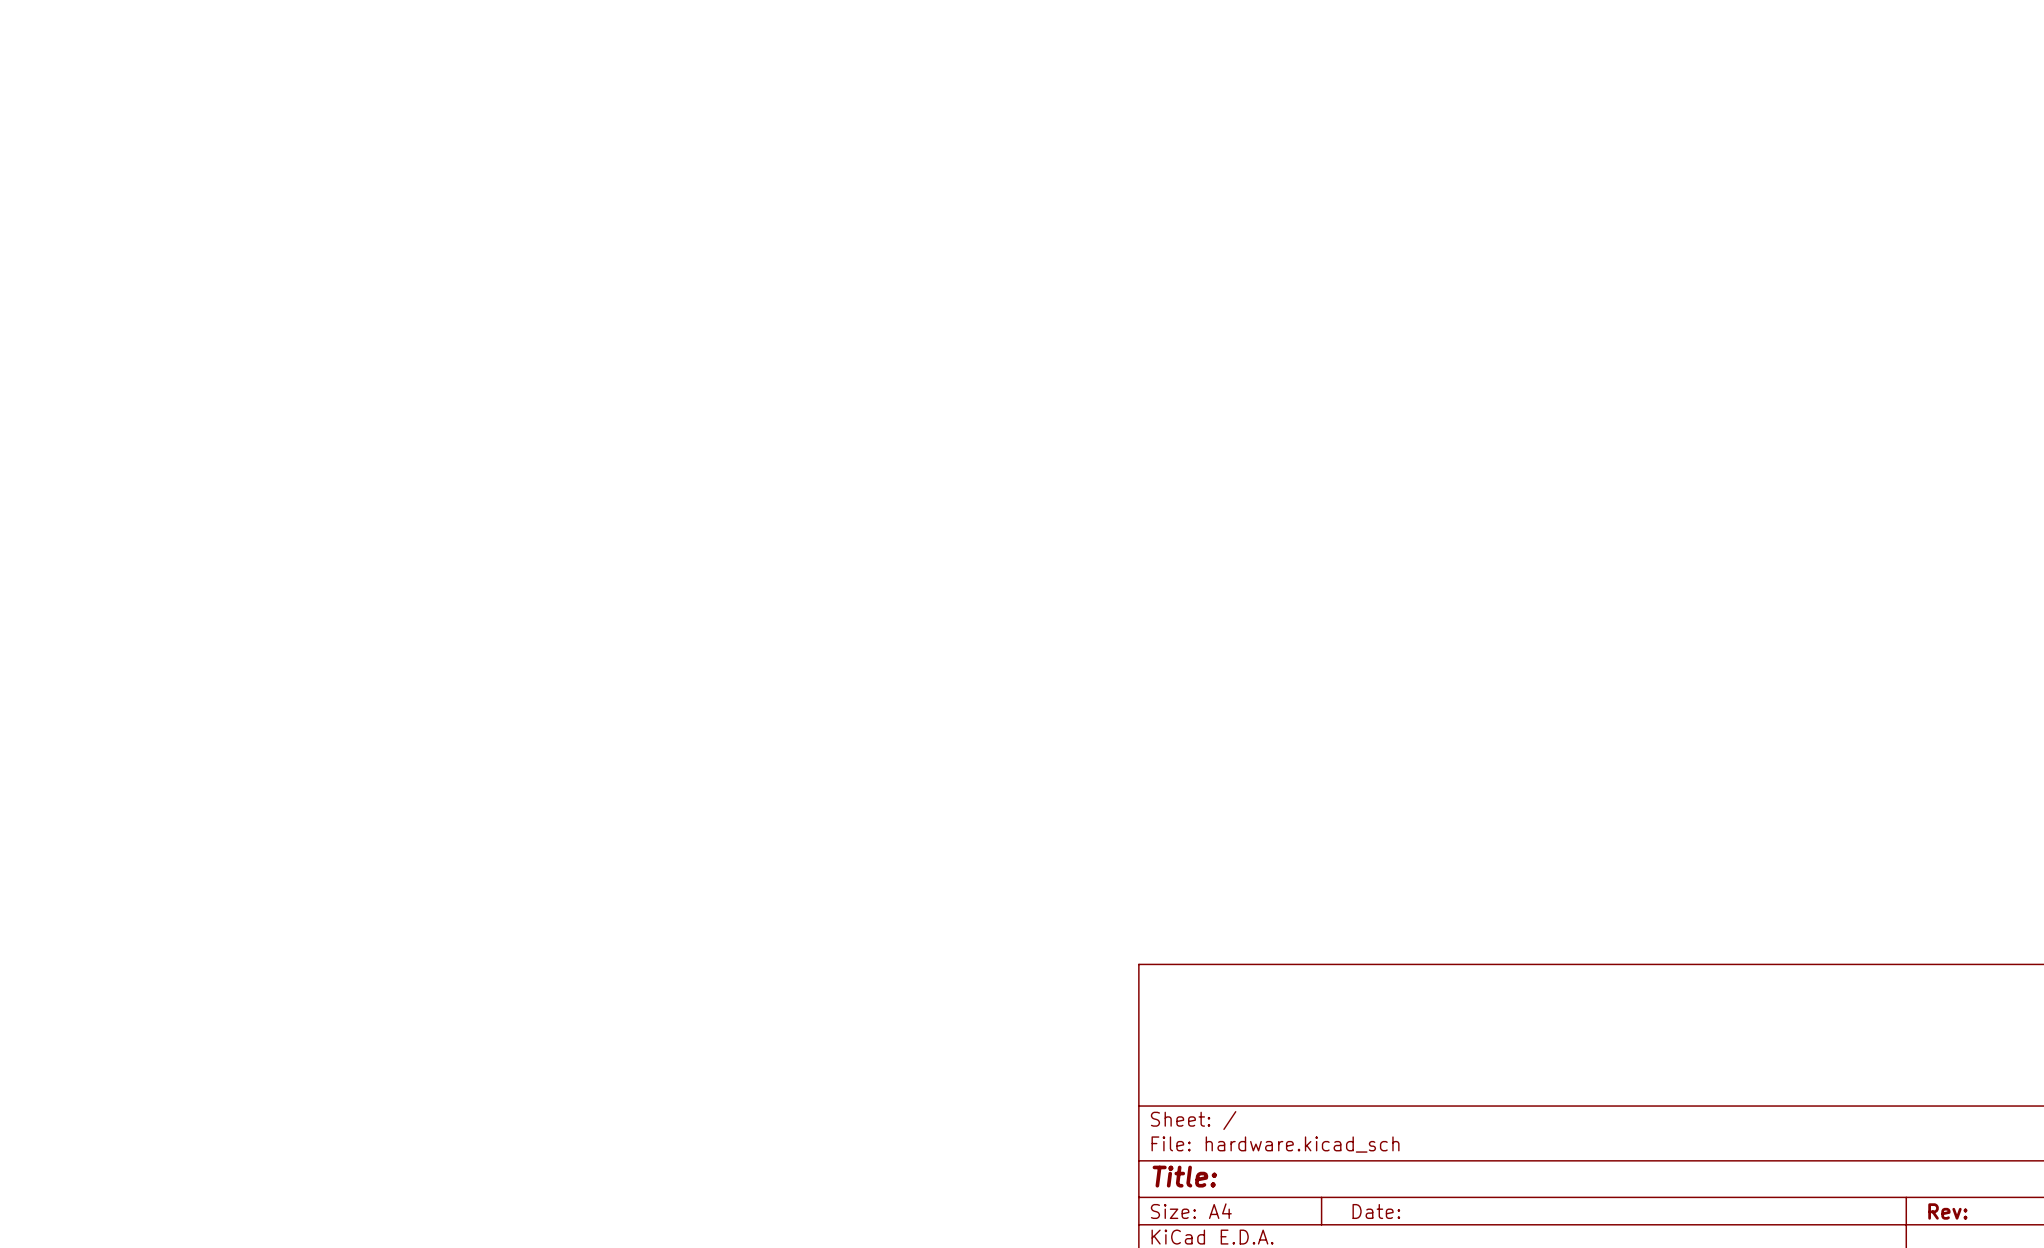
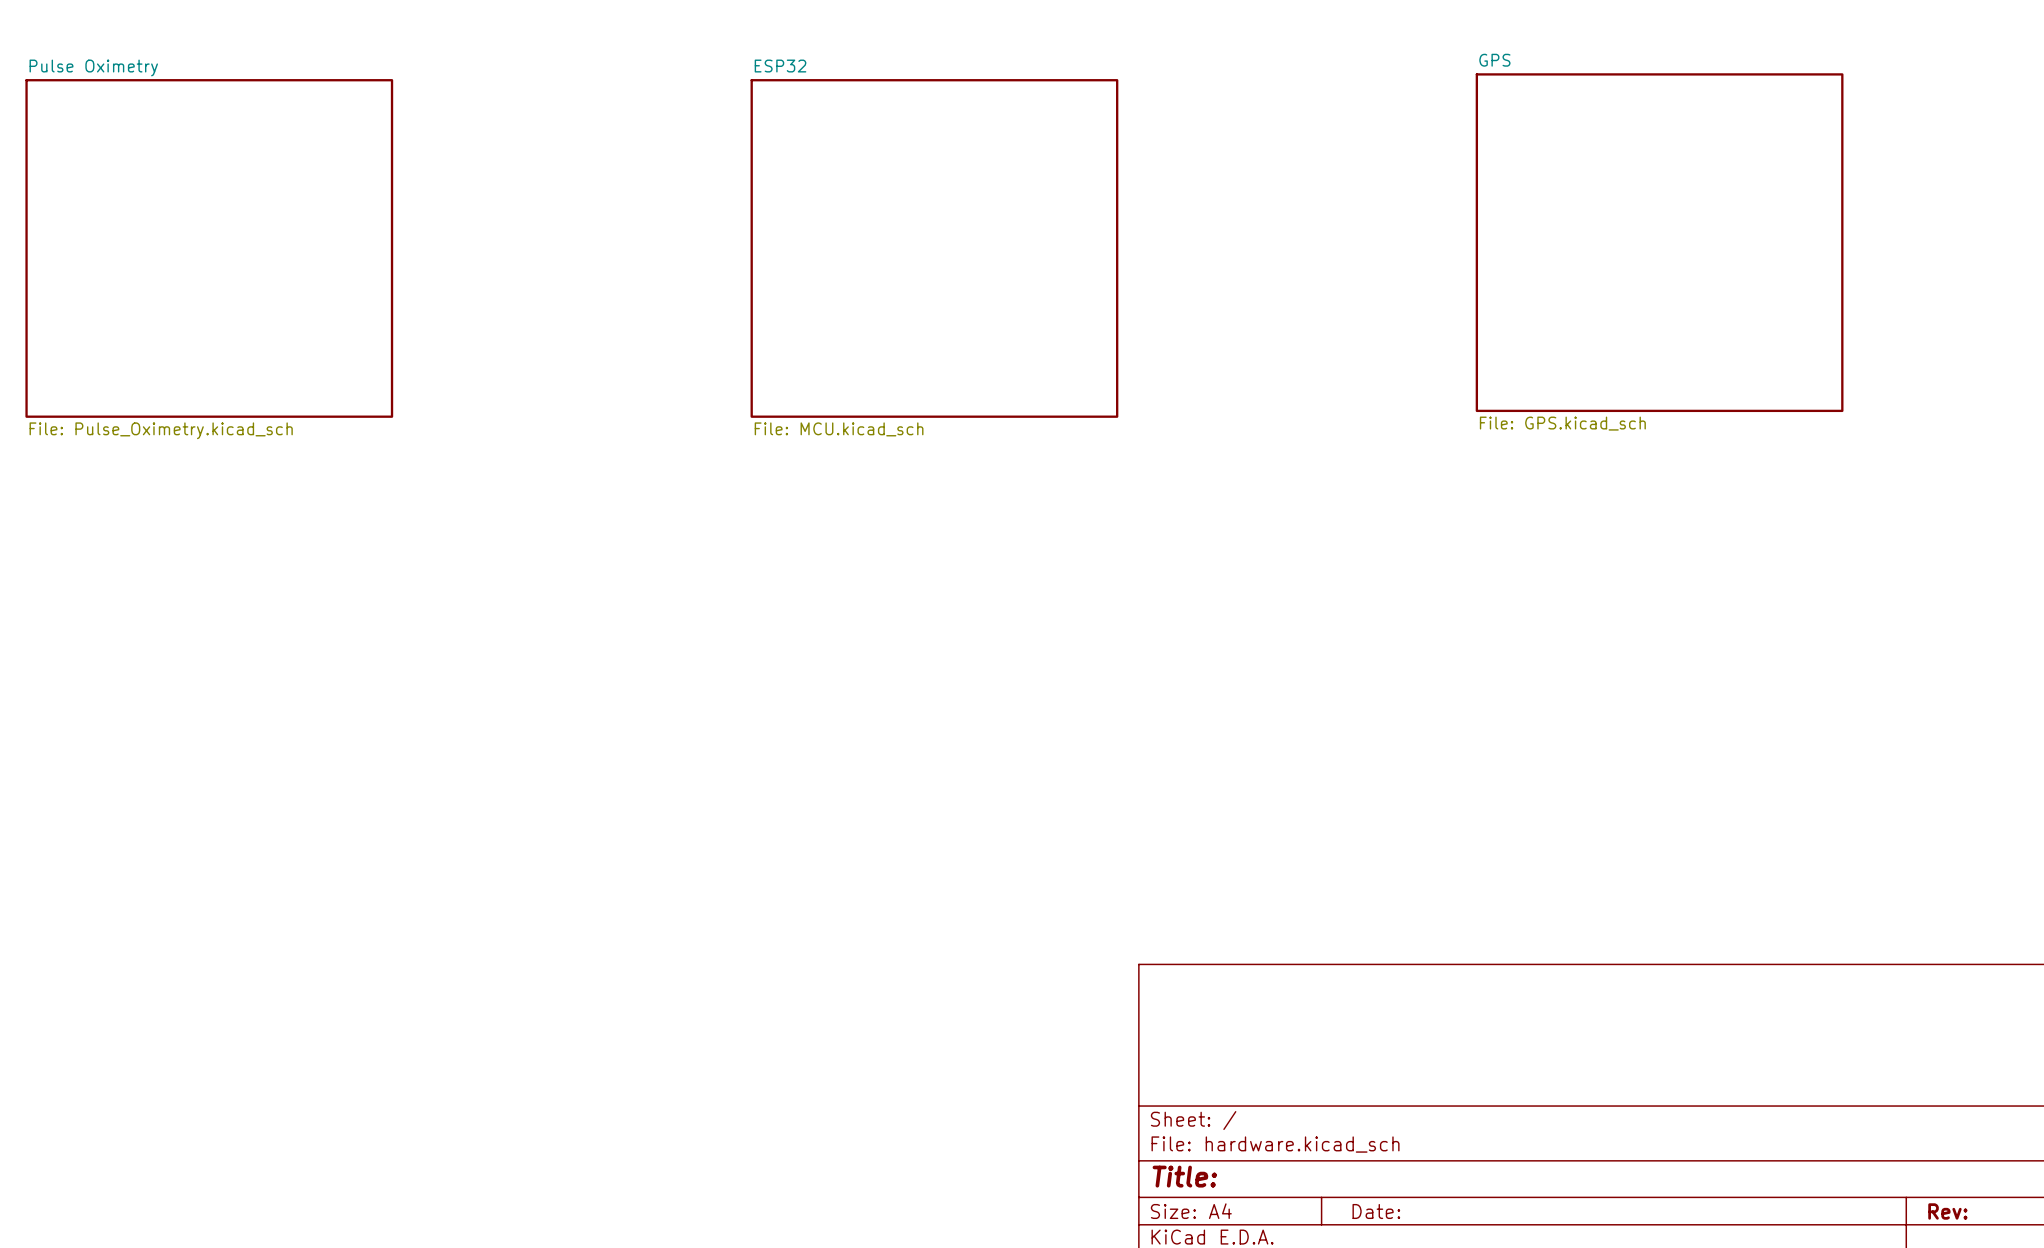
sheet GPS: none -> File: GPS.kicad_sch (1659, 242)
sheet Pulse Oximetry: none -> File: Pulse_Oximetry.kicad_sch (209, 248)
sheet ESP32: none -> File: MCU.kicad_sch (934, 248)

